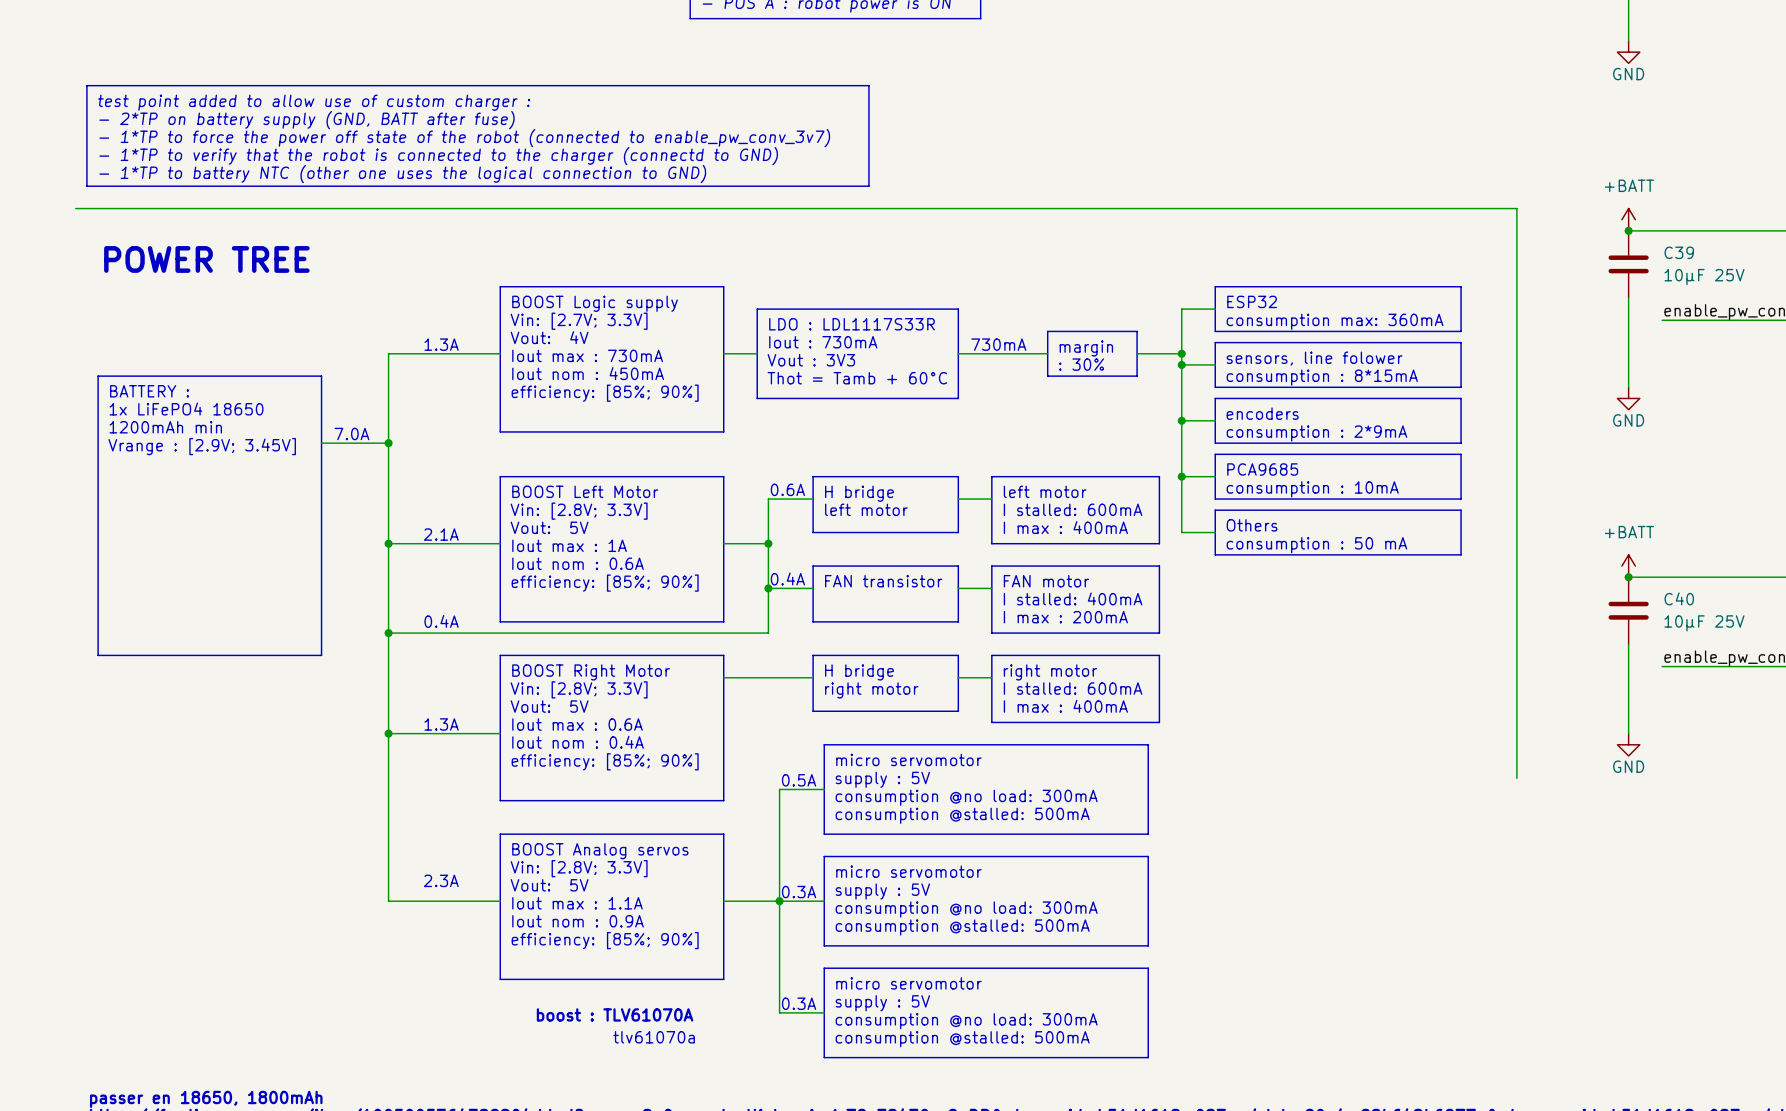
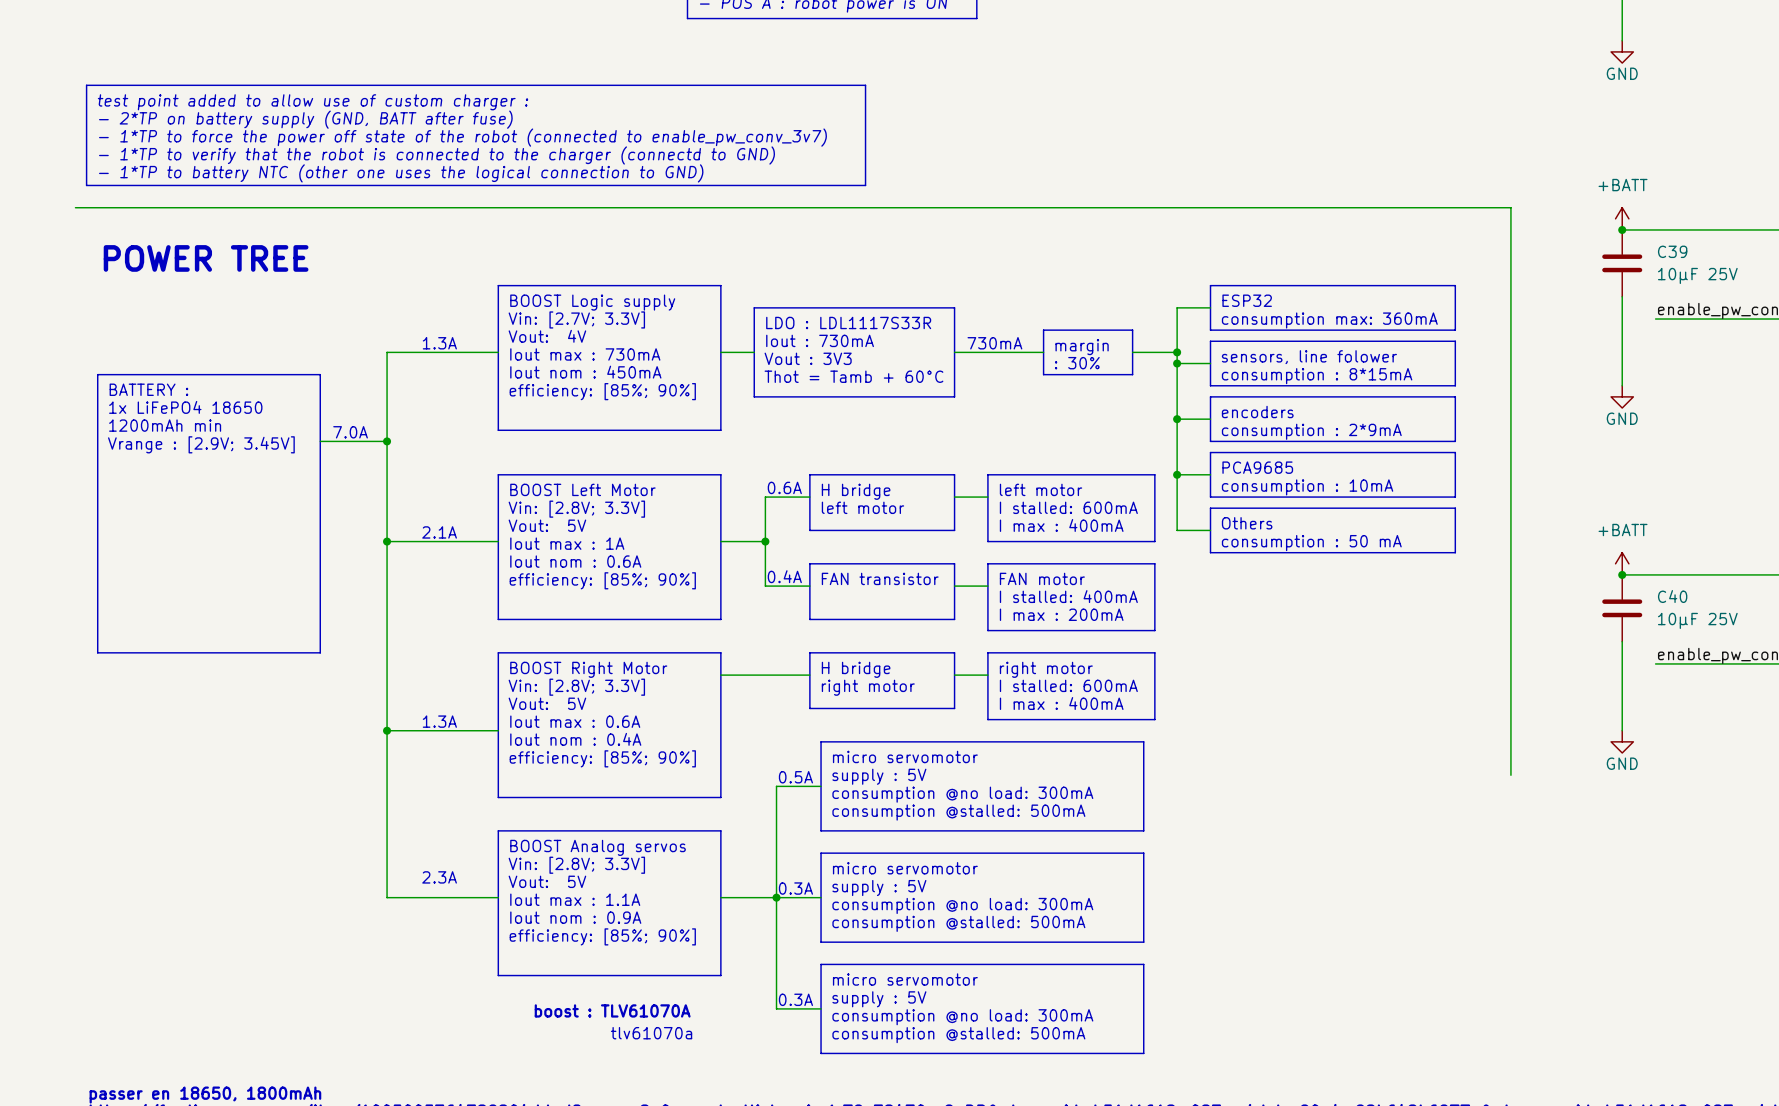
wire: (768, 588) (768, 633) (388, 633) -> none
junction: (768, 588) -> none
text: 0.4A (441, 621) -> none
junction: (388, 633) -> none

